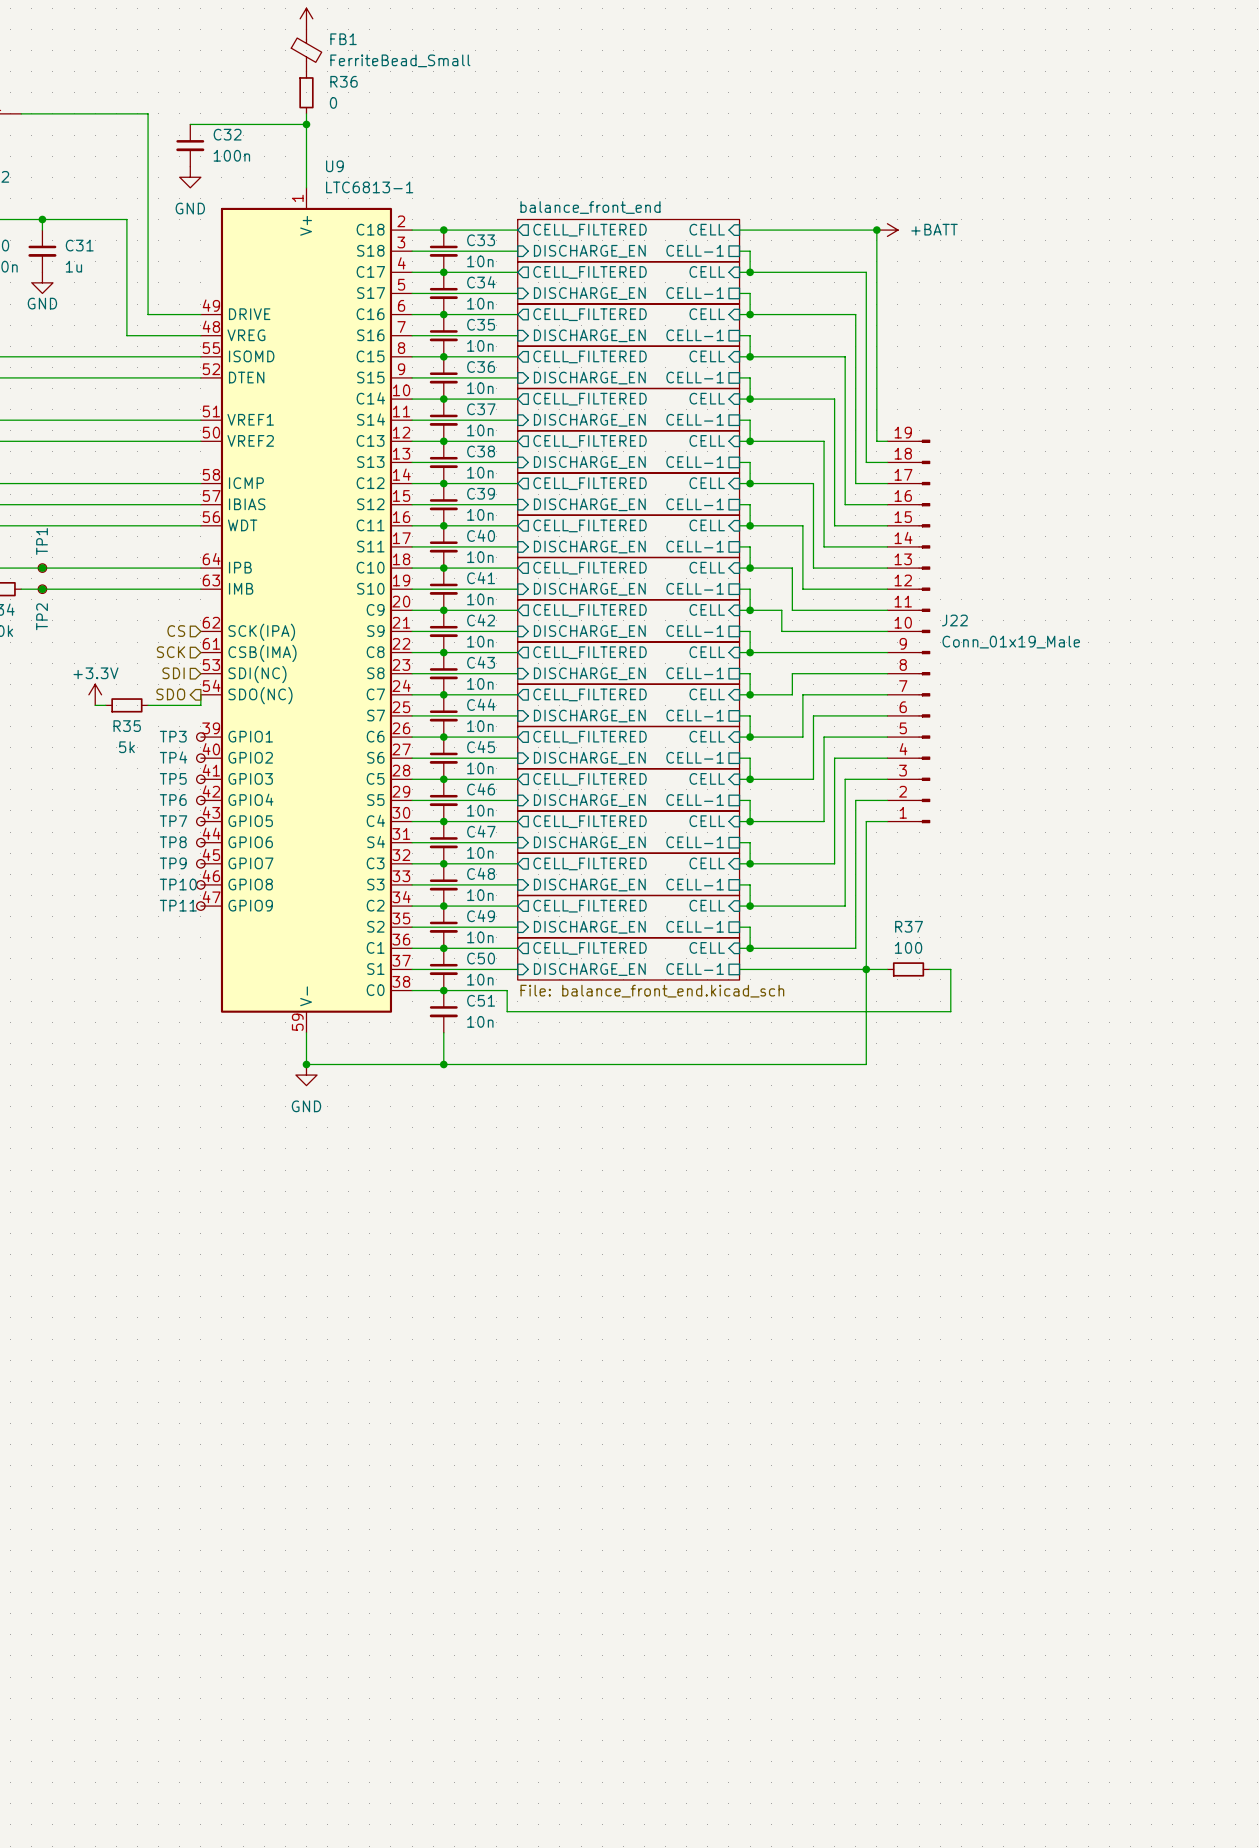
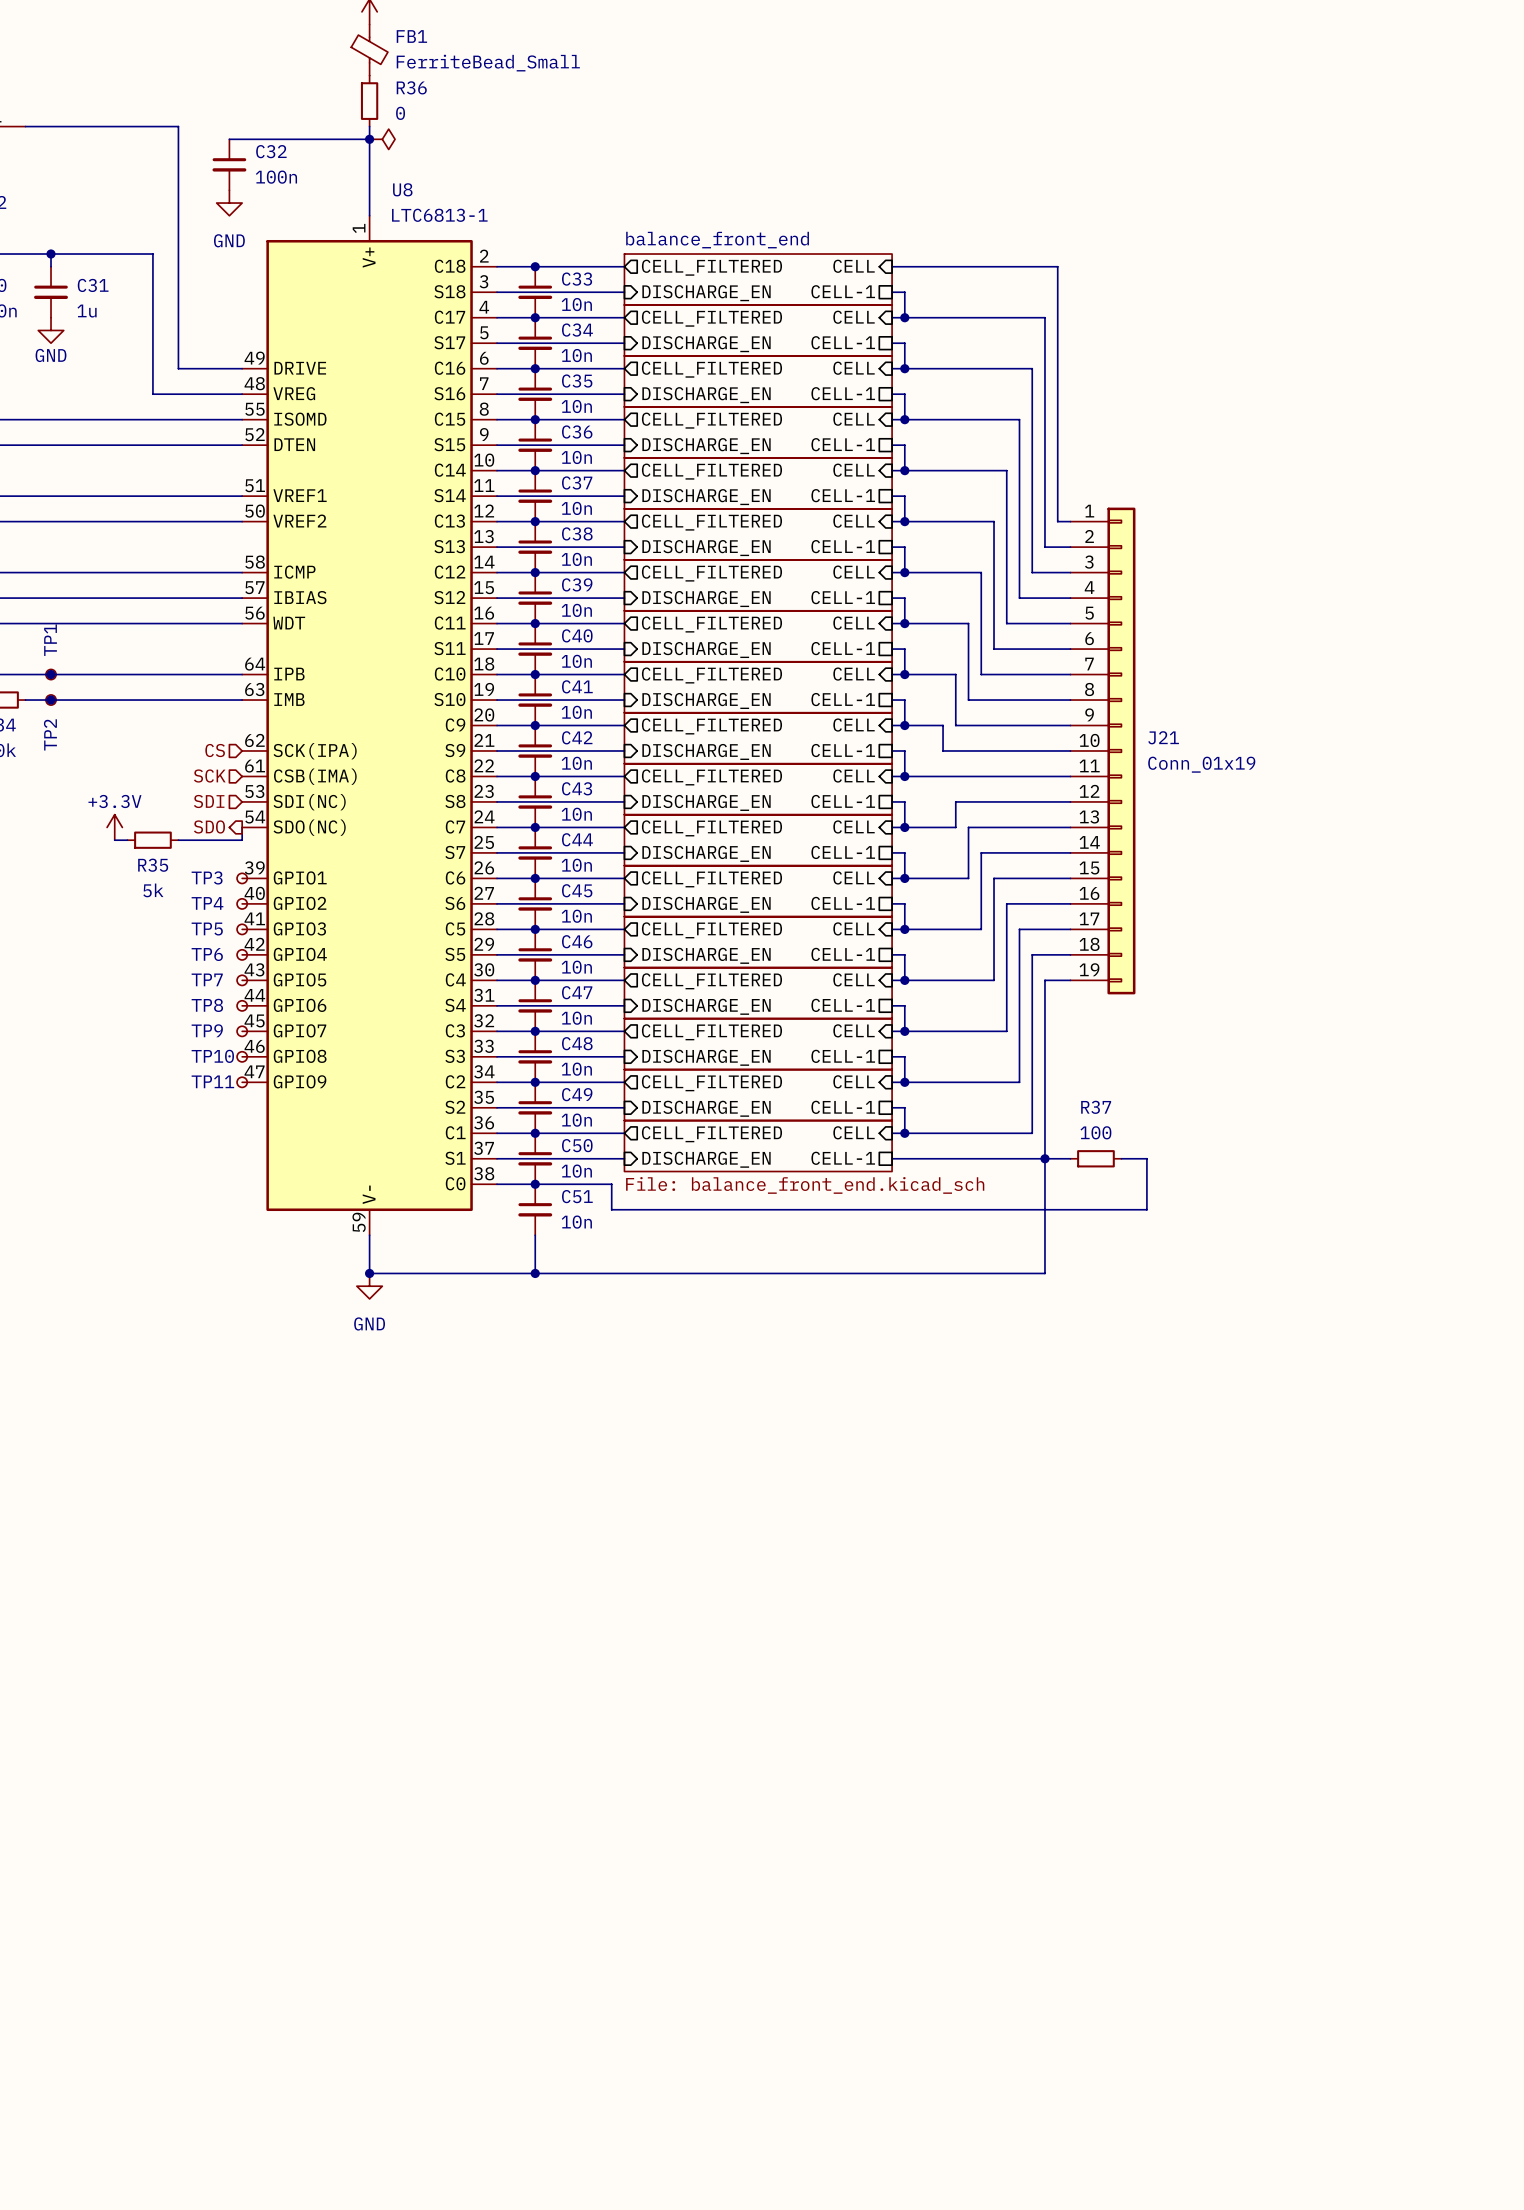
power symbol: none -> (382, 139)
U9 name: U9 (334, 166) -> U8 (402, 189)
junction: (876, 230) -> none
power symbol: +BATT (887, 230) -> none
J22: Conn_01x19_Male (908, 631) -> none
J21: none -> Conn_01x19 (1102, 750)

